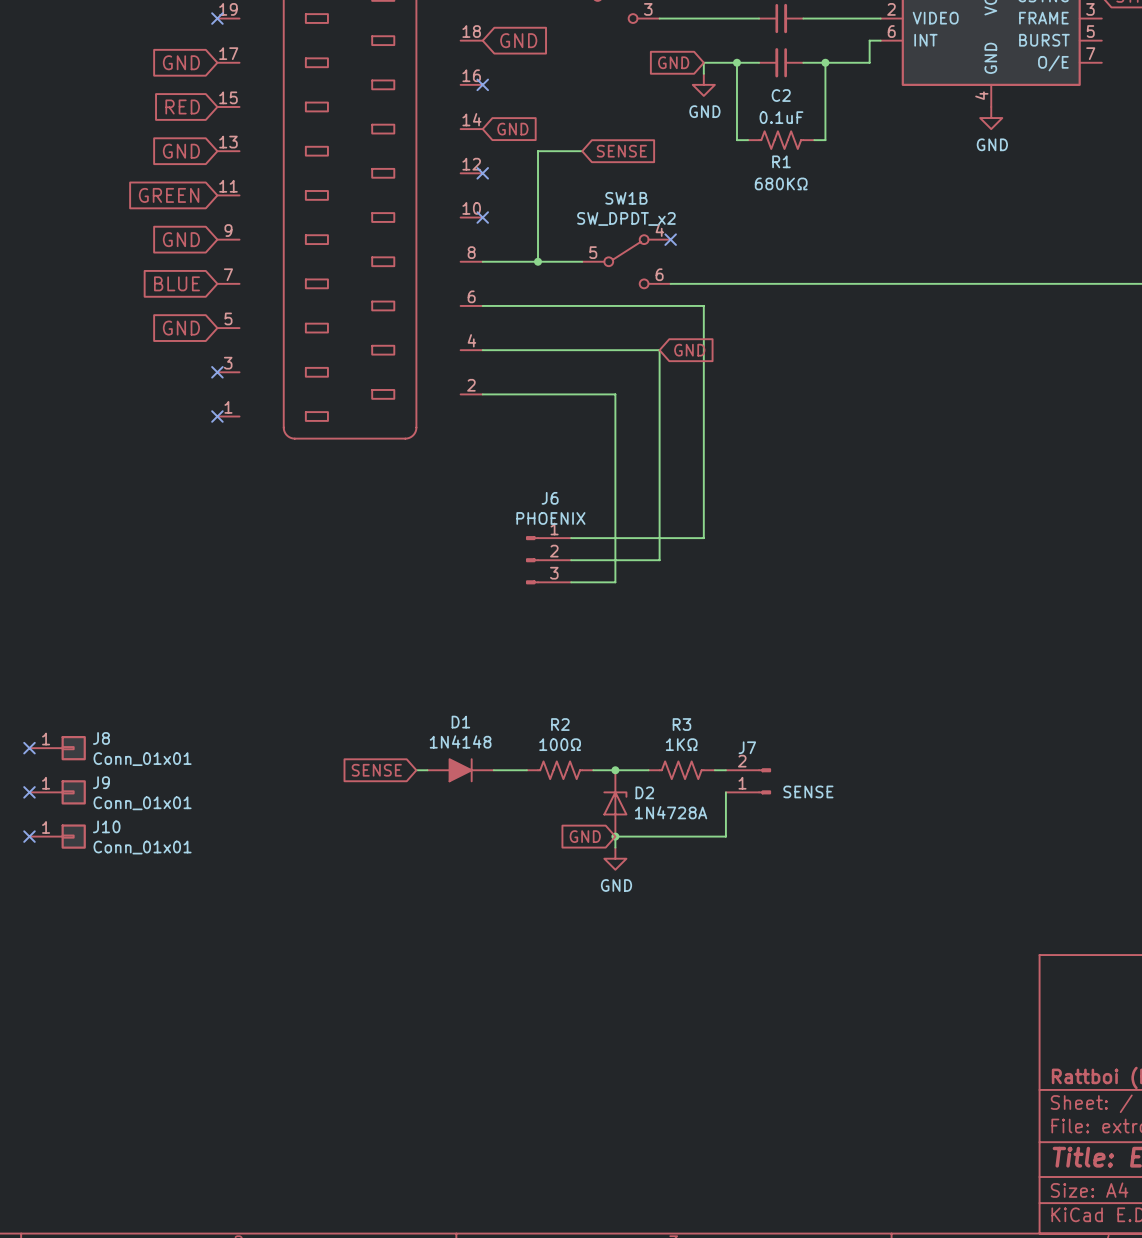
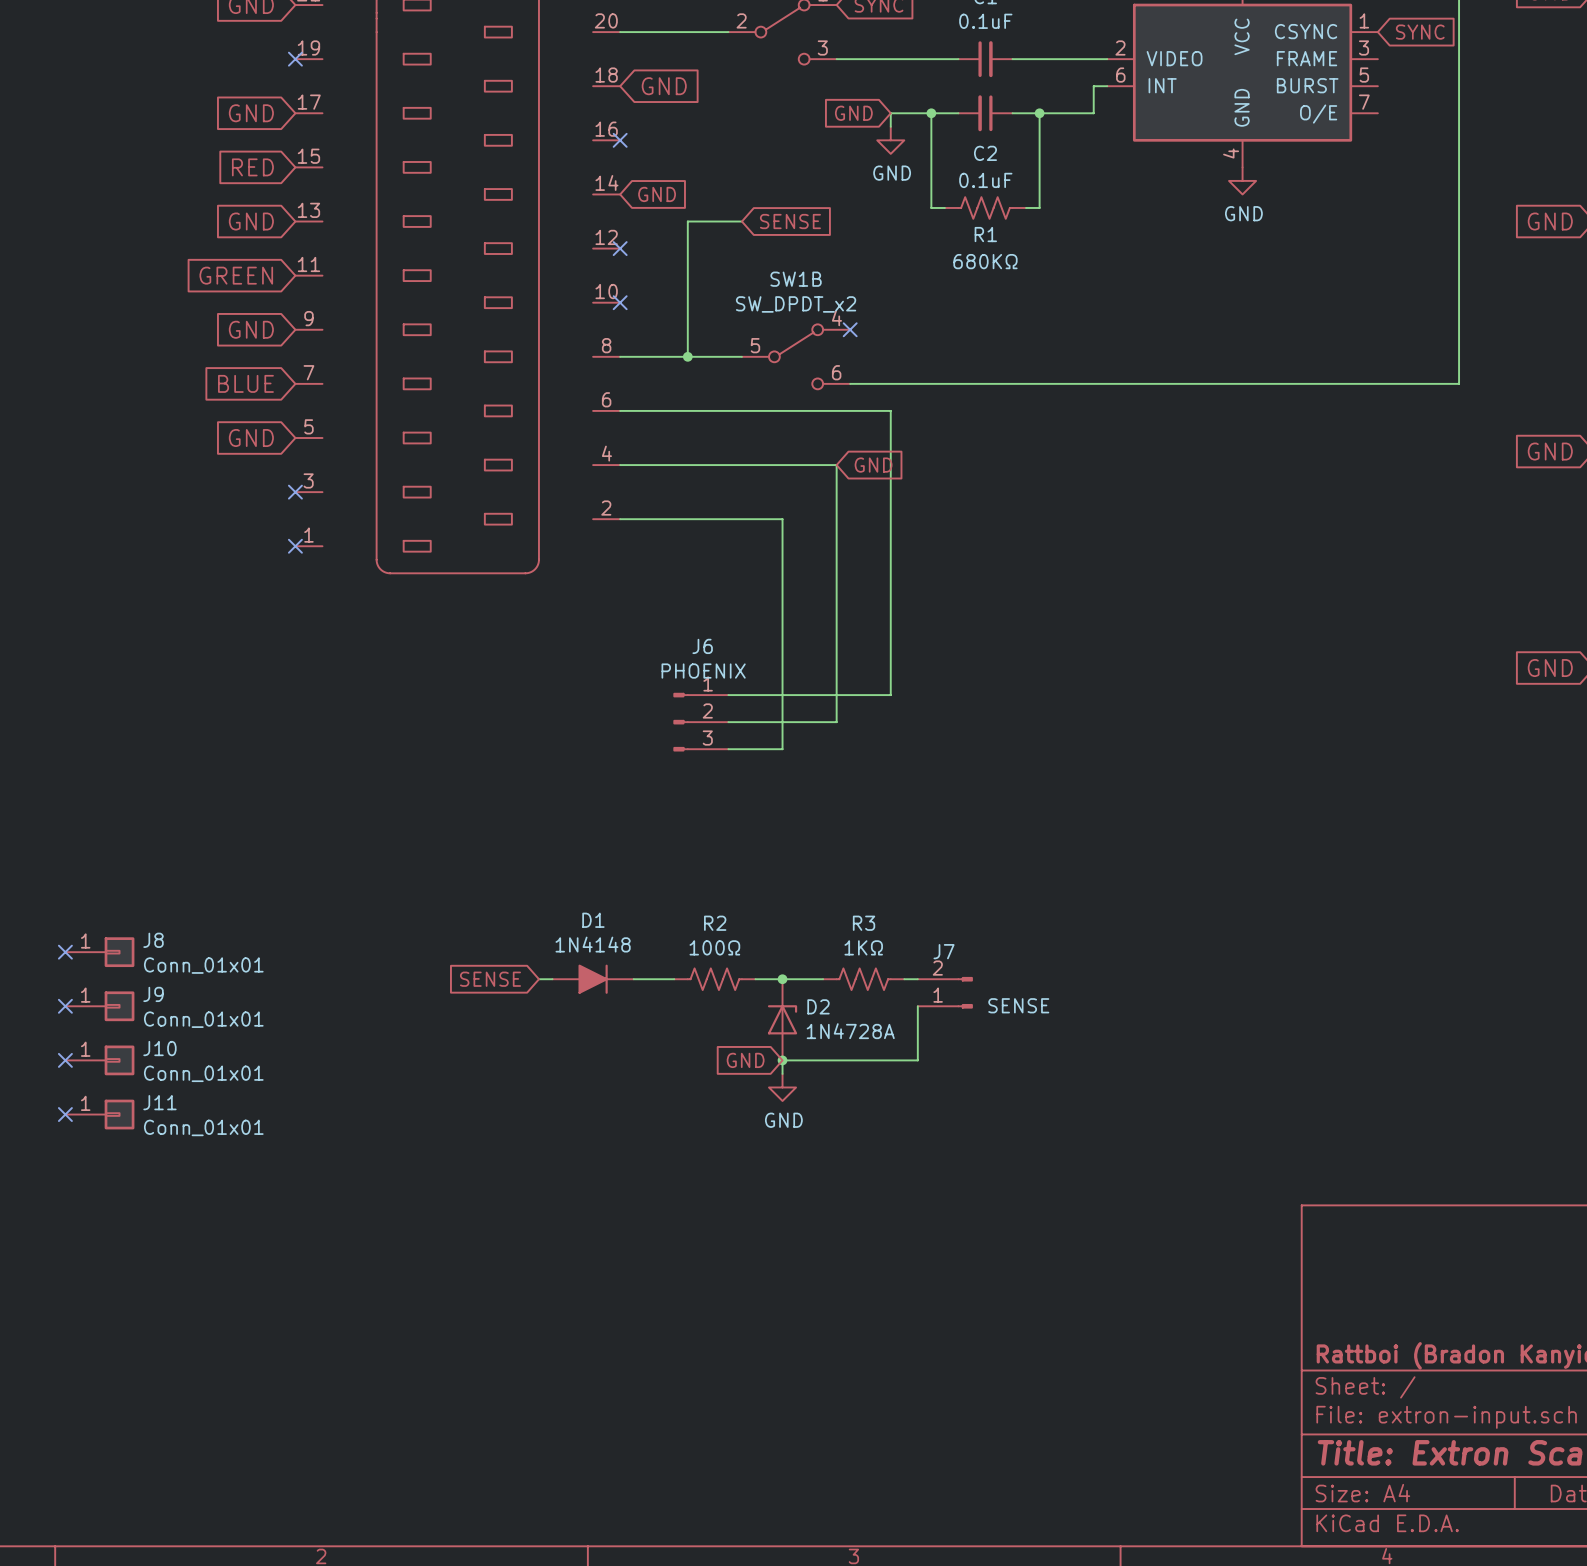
no-connect mark: none -> (65, 1114)
J11: none -> Conn_01x01 (99, 1114)

